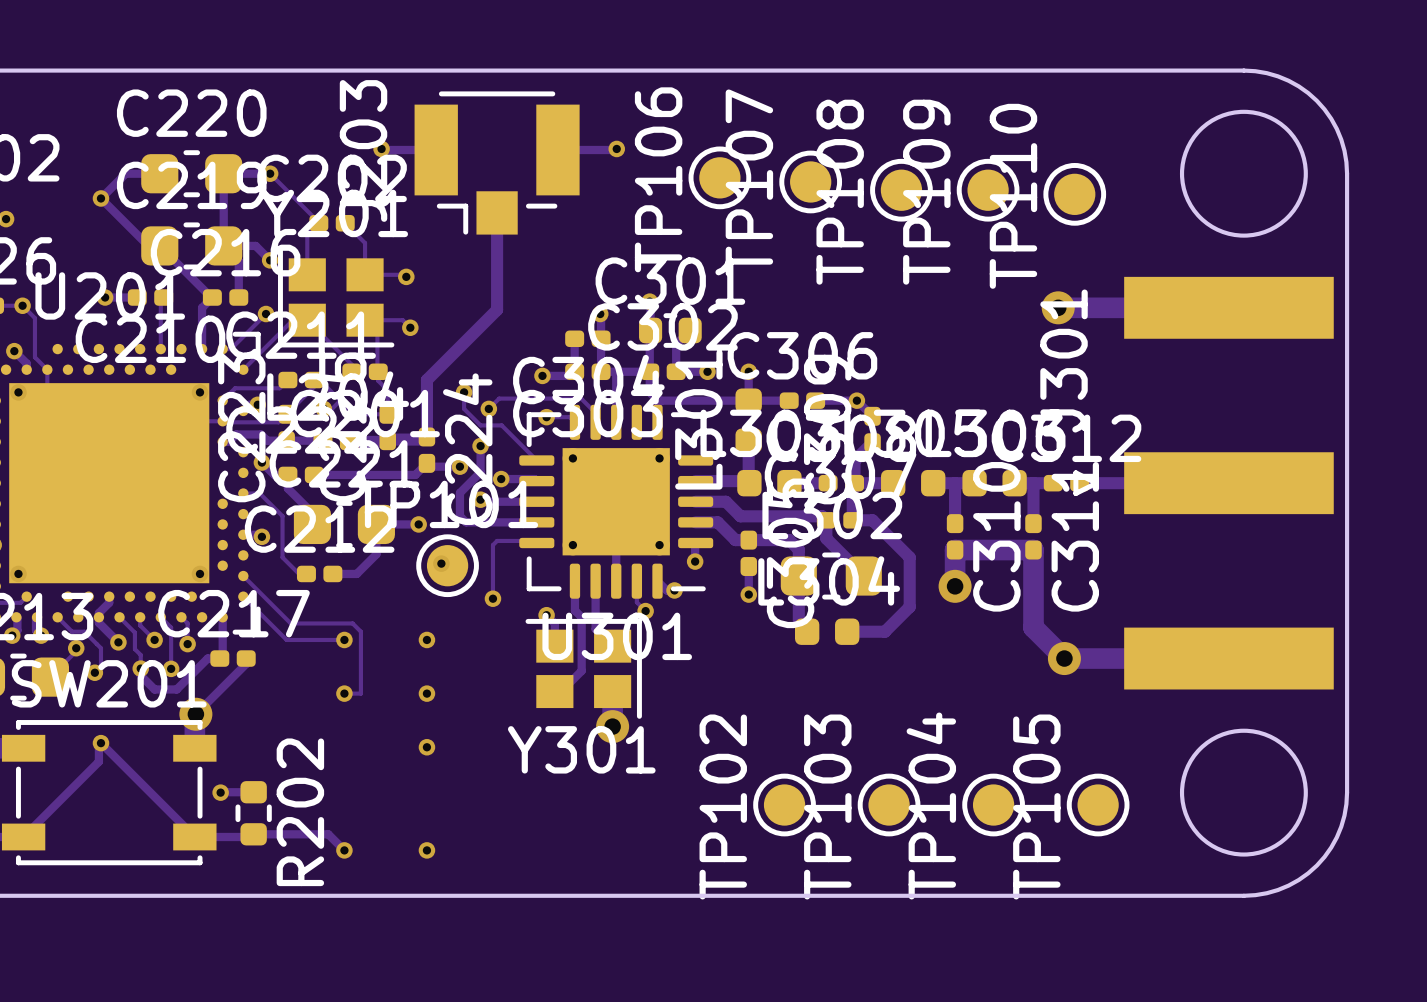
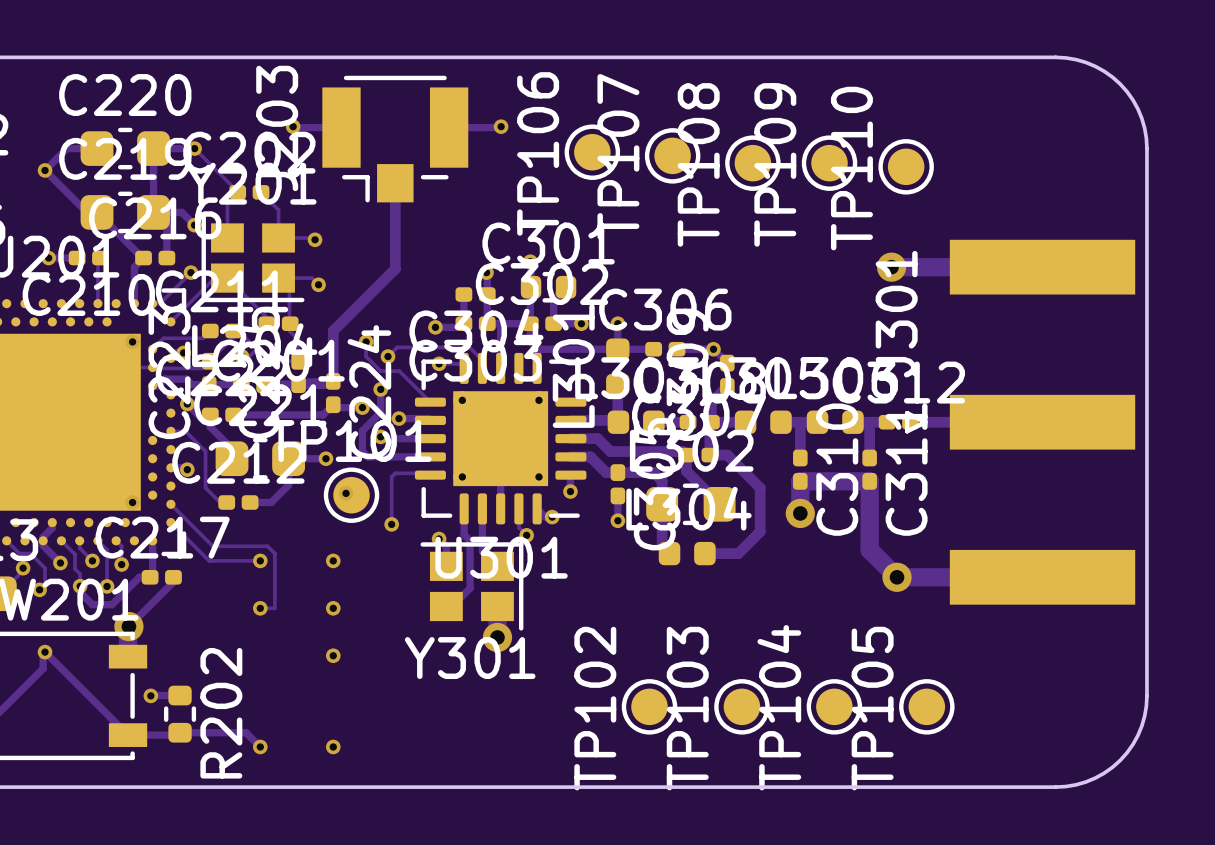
round board edge: [1179, 109, 1308, 238] -> none
round board edge: [1179, 728, 1308, 857] -> none

